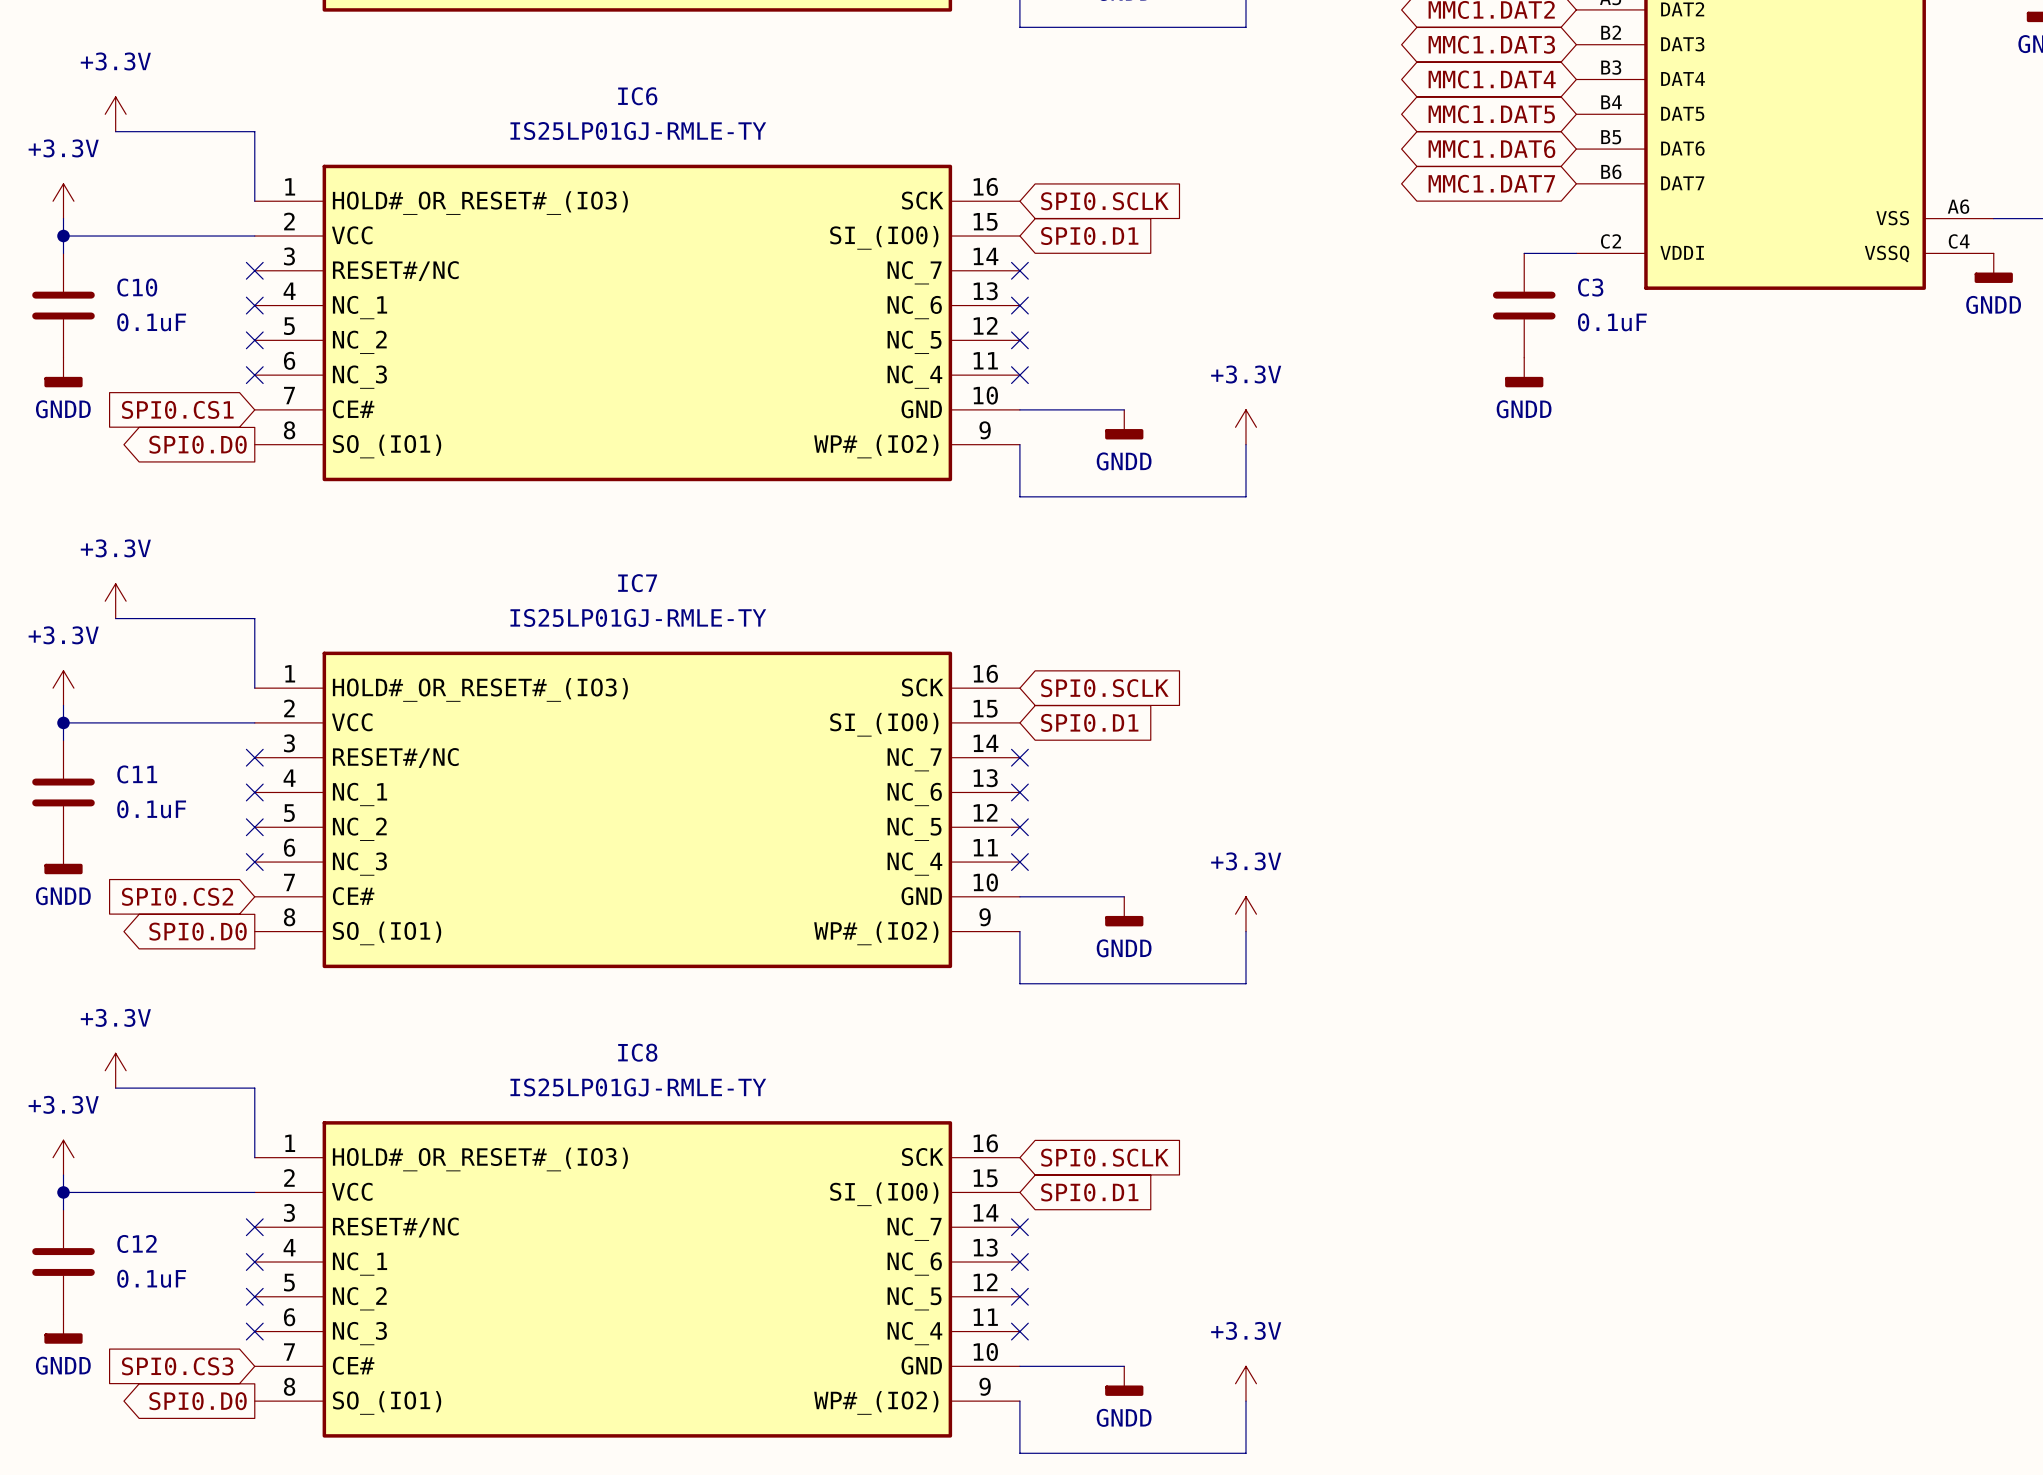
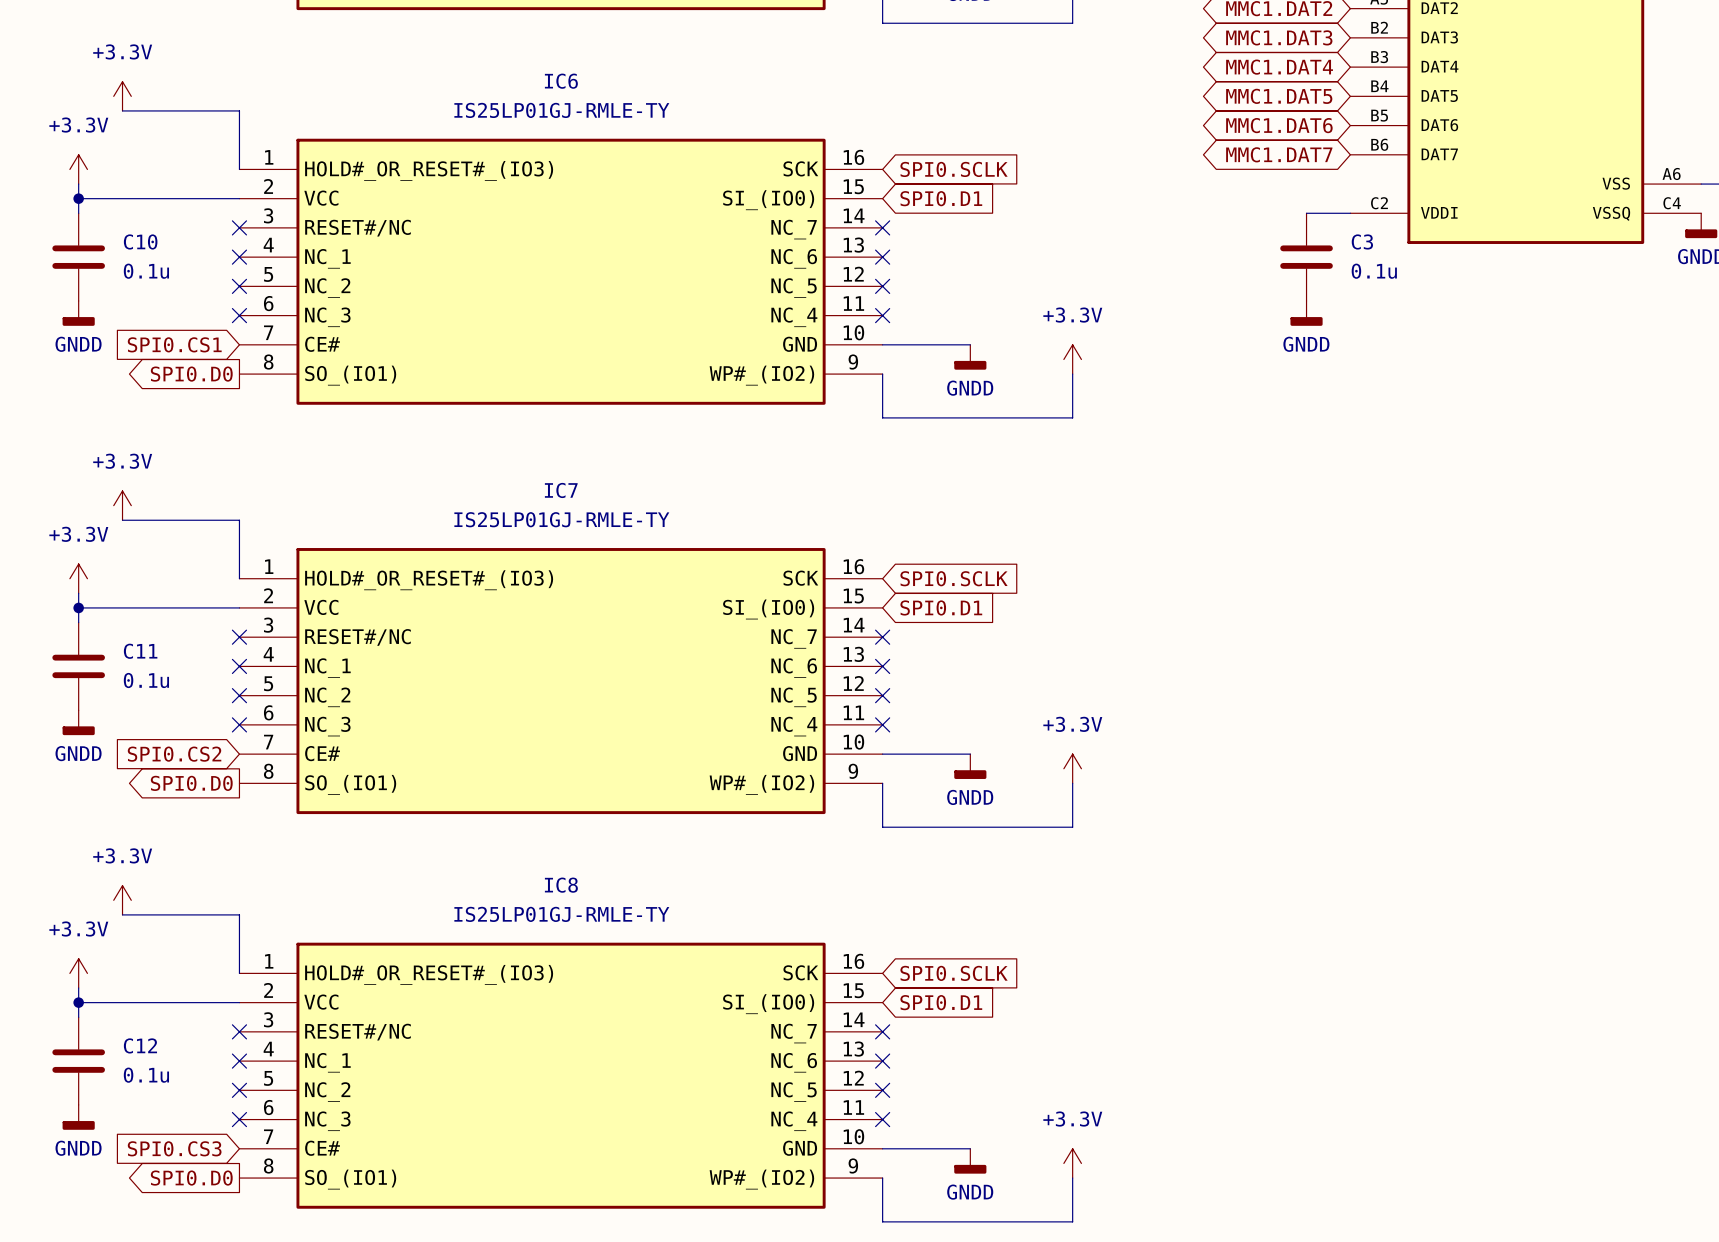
C10 value: 0.1uF (151, 322) -> 0.1u (146, 271)
C3 value: 0.1uF (1612, 322) -> 0.1u (1374, 271)
C11 value: 0.1uF (151, 809) -> 0.1u (146, 680)
C12 value: 0.1uF (151, 1278) -> 0.1u (146, 1075)

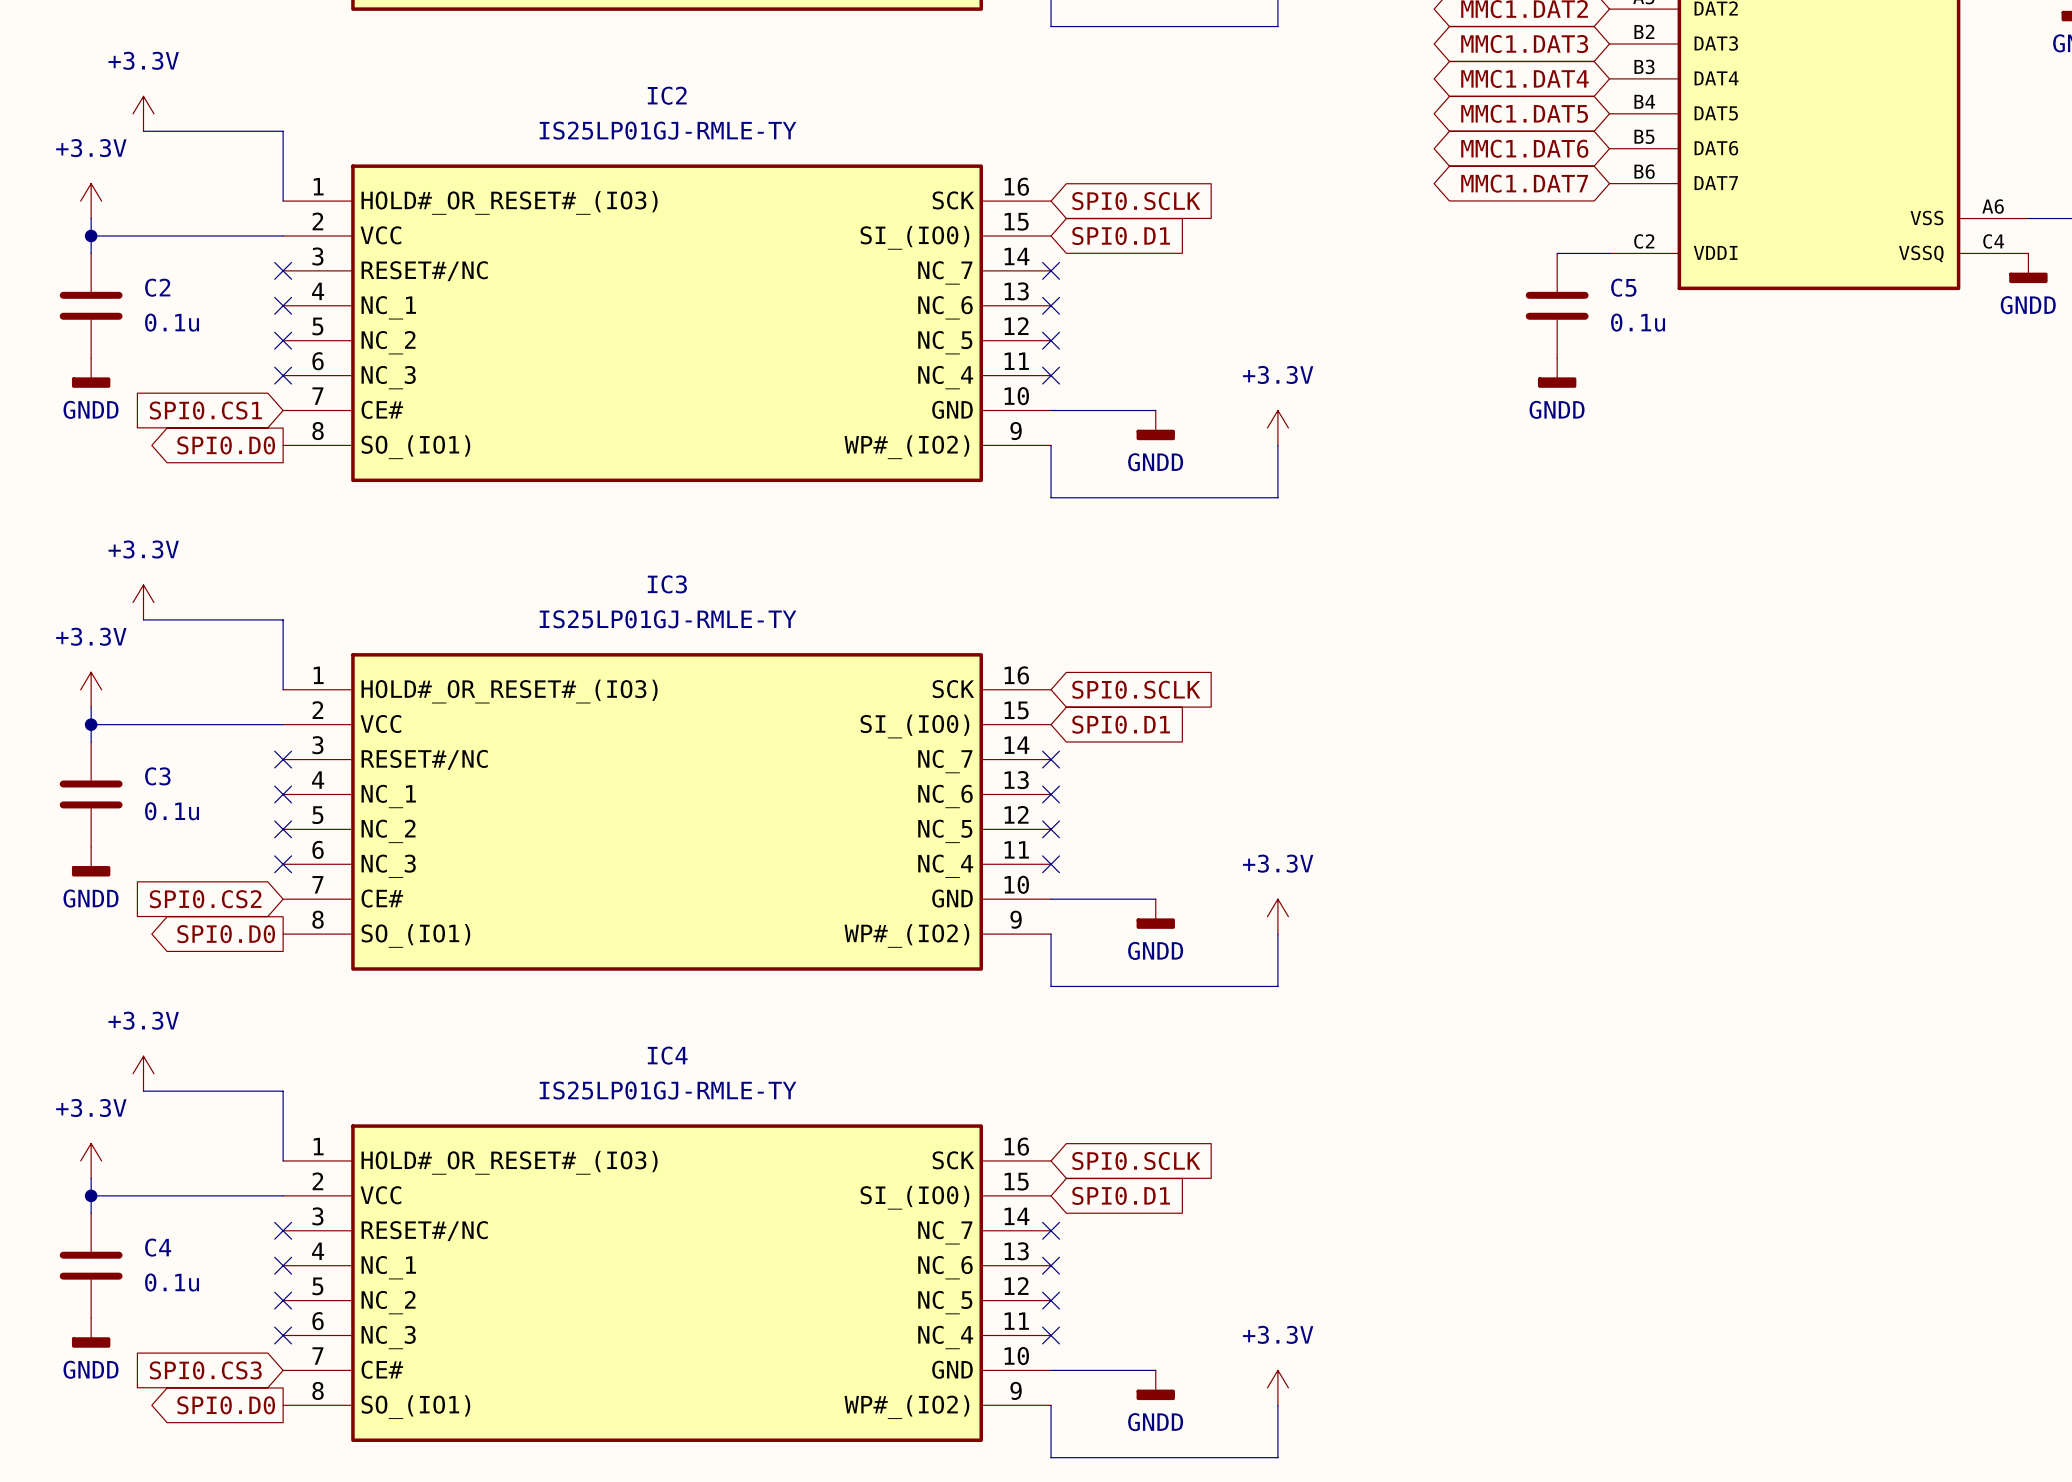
IC6 name: IC6 (561, 81) -> IC2 (667, 95)
C10 name: C10 (140, 241) -> C2 (157, 287)
C3 name: C3 (1362, 241) -> C5 (1623, 287)
IC7 name: IC7 (561, 490) -> IC3 (667, 584)
C11 name: C11 (140, 651) -> C3 (157, 776)
IC8 name: IC8 (561, 885) -> IC4 (667, 1055)
C12 name: C12 (140, 1045) -> C4 (158, 1247)

